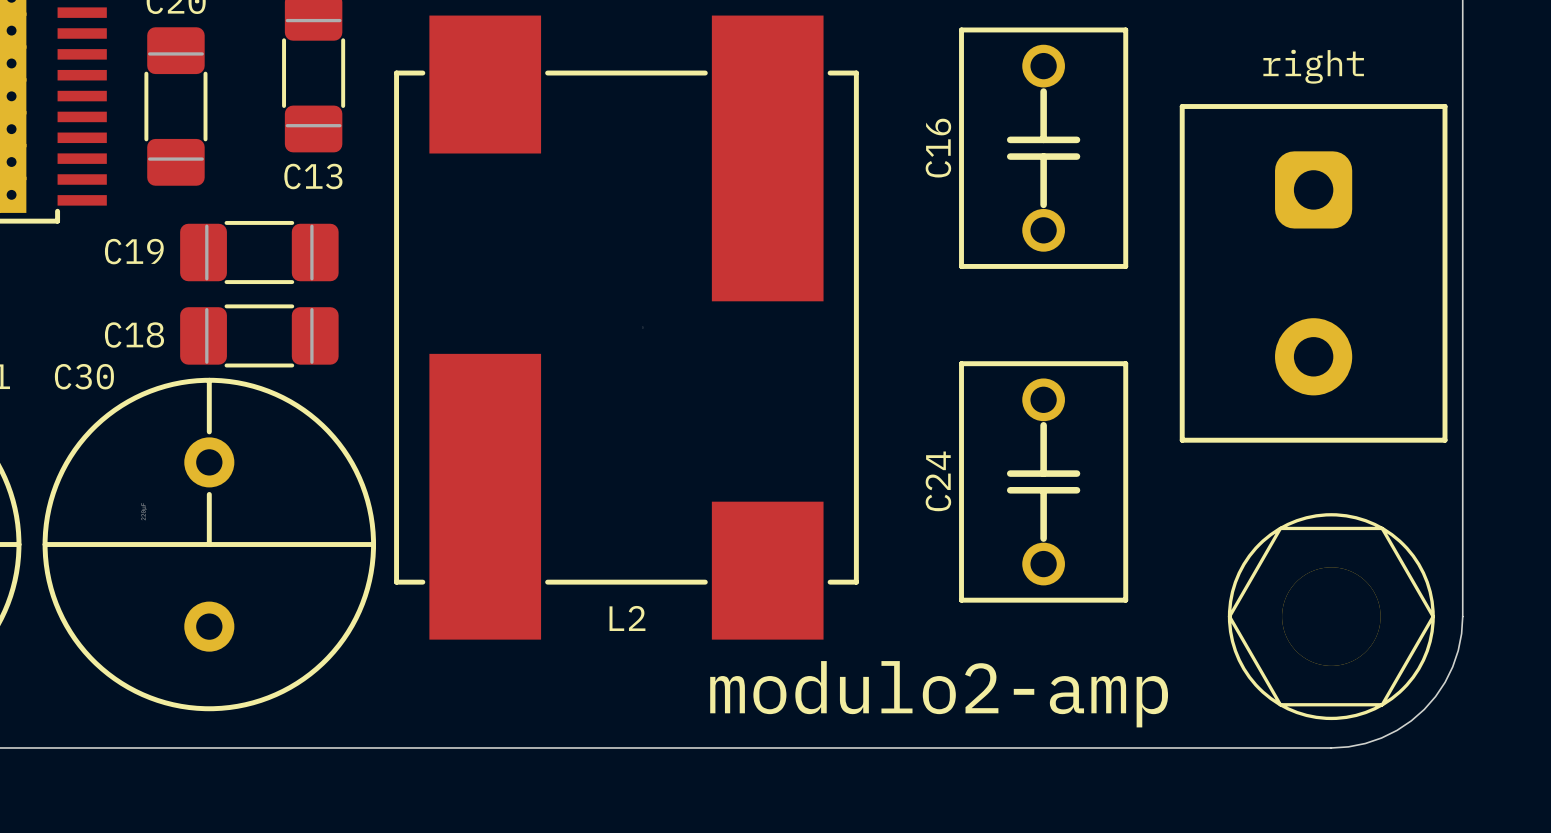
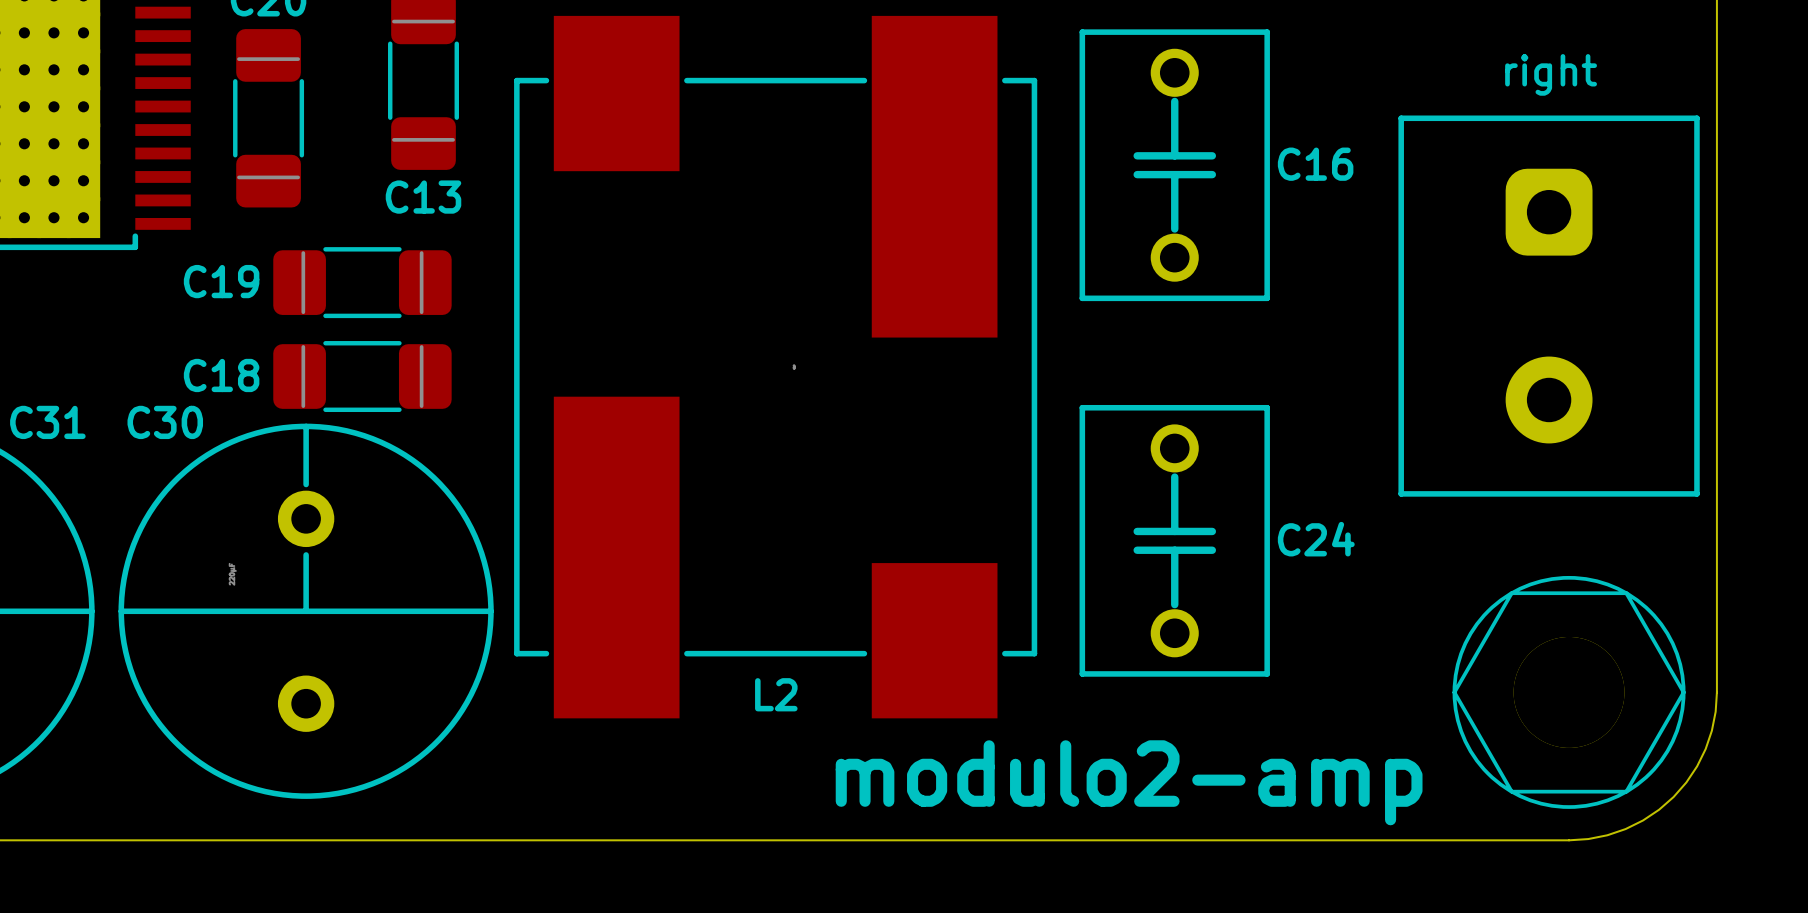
C16 name rotation: 0° (938, 148) -> 90° clockwise (1315, 164)
C16 name position: C16 (938, 148) -> C16 (1315, 164)
C16 position: (1043, 148) -> (1174, 165)
C24 name rotation: 0° (938, 481) -> 90° clockwise (1316, 539)
C24 name position: C24 (938, 481) -> C24 (1316, 539)
C24 position: (1043, 481) -> (1174, 540)

